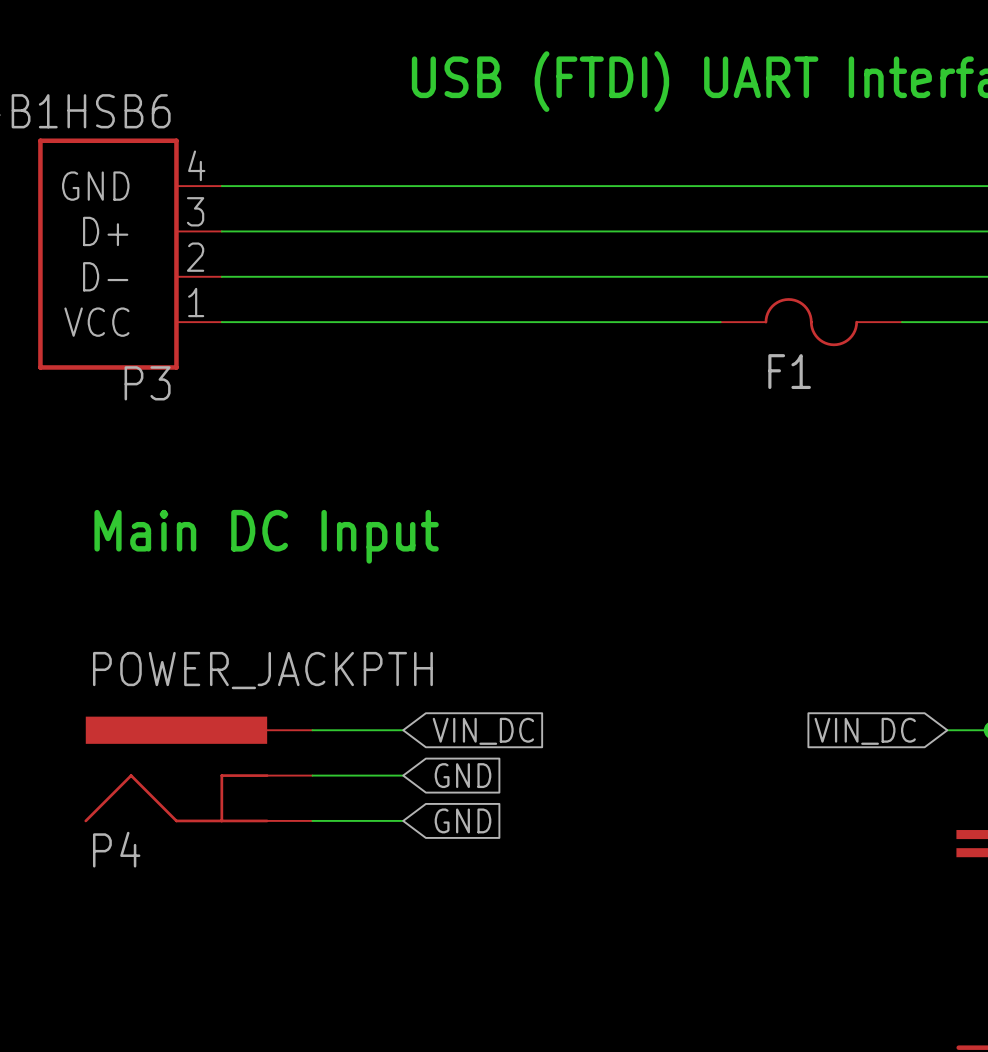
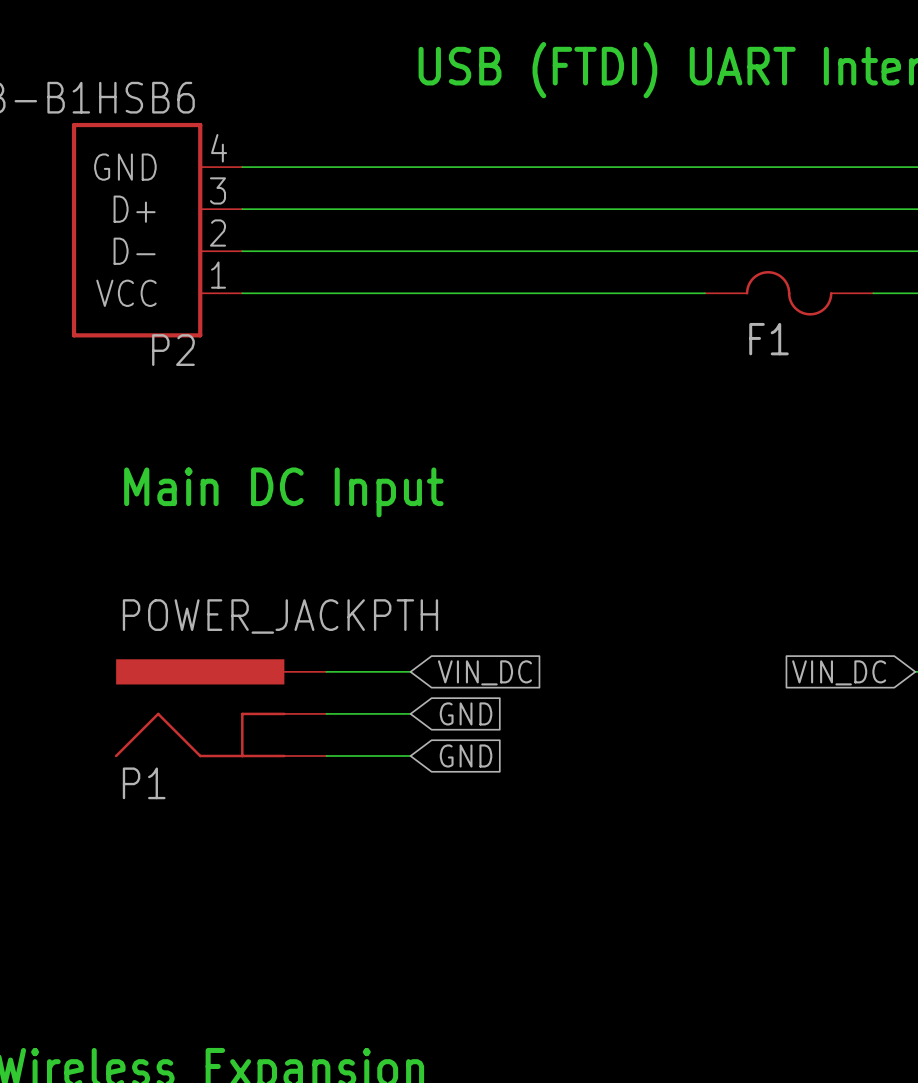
P3 name: P3 (147, 383) -> P2 (173, 350)
P4 name: P4 (116, 849) -> P1 (144, 783)

